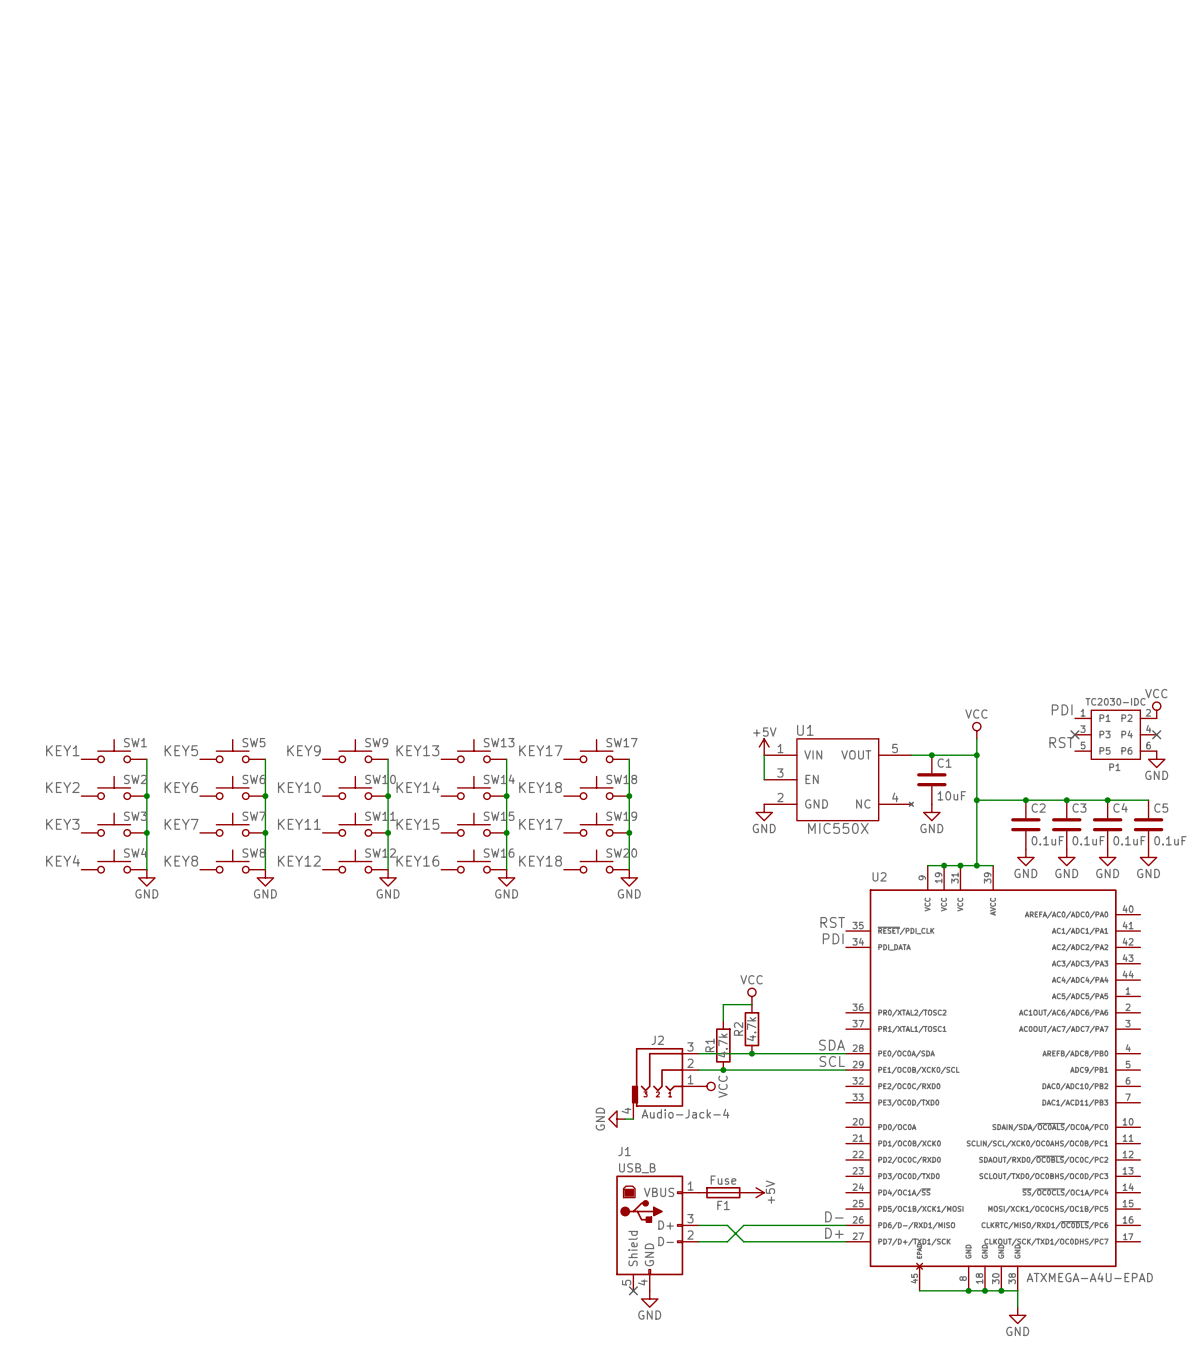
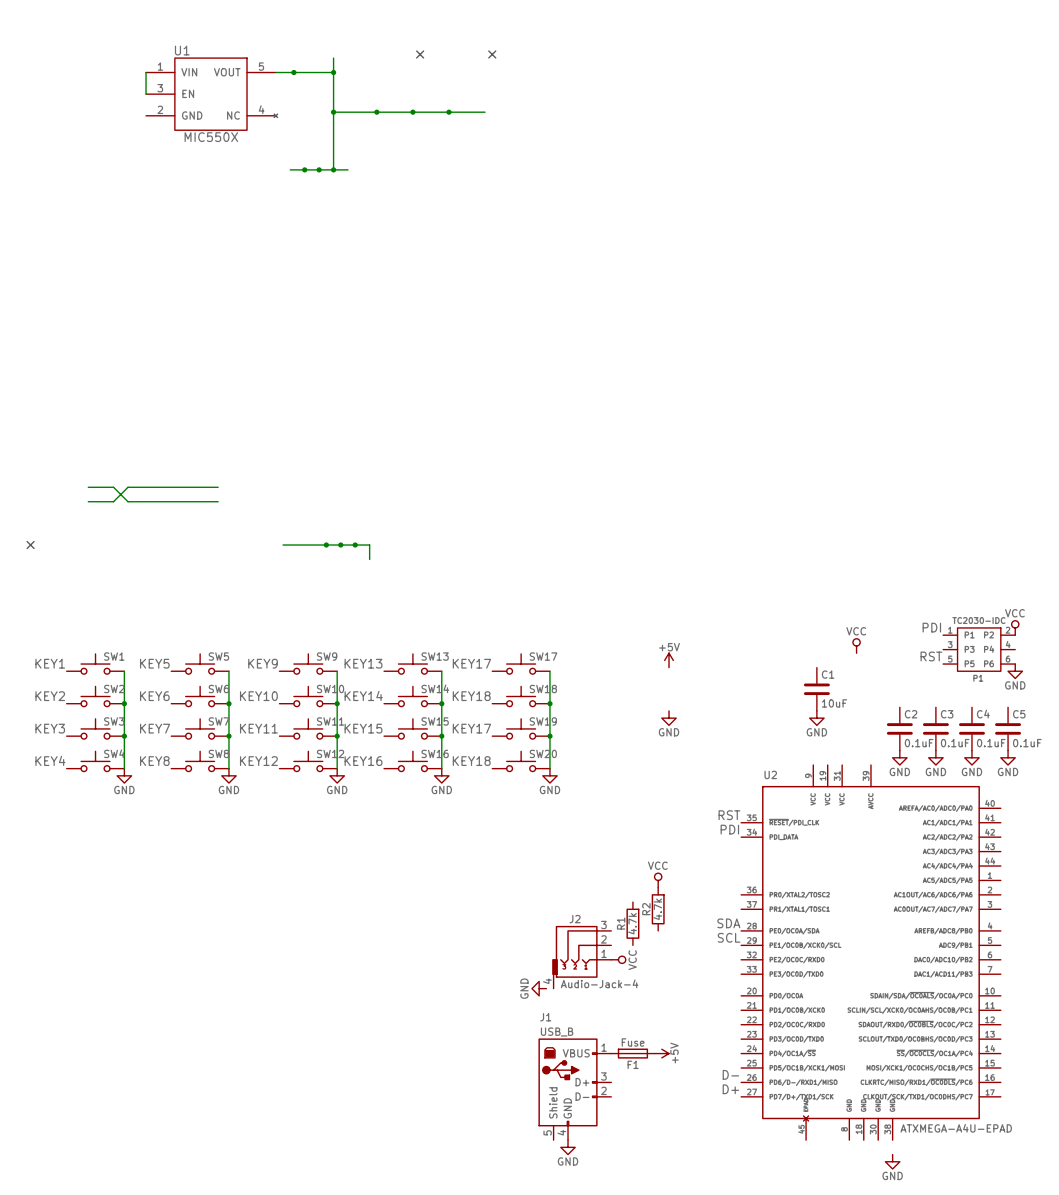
no-connect mark: none -> (420, 54)
no-connect mark: none -> (492, 54)
wire: none -> (333, 58) (333, 169)
wire: none -> (146, 72) (146, 94)
wire: none -> (275, 72) (333, 72)
junction: none -> (293, 72)
junction: none -> (333, 72)
wire: none -> (333, 112) (485, 112)
junction: none -> (333, 112)
junction: none -> (376, 112)
junction: none -> (412, 112)
junction: none -> (448, 112)
wire: none -> (290, 169) (347, 169)
junction: none -> (304, 169)
junction: none -> (319, 169)
junction: none -> (333, 169)
wire: none -> (88, 487) (113, 487) (127, 501) (218, 501)
wire: none -> (218, 487) (127, 487) (113, 501) (88, 501)
no-connect mark: none -> (30, 545)
wire: none -> (283, 545) (369, 545) (369, 559)
junction: none -> (326, 545)
junction: none -> (340, 545)
junction: none -> (355, 545)
no-connect mark: (1074, 734) -> none
no-connect mark: (1156, 734) -> none
wire: (976, 738) (976, 865) -> none
wire: (764, 755) (764, 779) -> none
wire: (911, 755) (976, 755) -> none
junction: (931, 755) -> none
junction: (976, 755) -> none
U1 position: (838, 779) -> (211, 94)
wire: (976, 800) (1148, 800) -> none
junction: (976, 800) -> none
junction: (1025, 800) -> none
junction: (1066, 800) -> none
junction: (1107, 800) -> none
wire: (927, 865) (993, 865) -> none
junction: (944, 865) -> none
junction: (960, 865) -> none
junction: (976, 865) -> none
wire: (751, 1004) (723, 1004) (723, 1020) -> none
wire: (698, 1053) (845, 1053) -> none
junction: (751, 1053) -> none
wire: (698, 1070) (845, 1070) -> none
junction: (723, 1070) -> none
wire: (625, 1119) (633, 1119) -> none
wire: (698, 1225) (727, 1225) (743, 1241) (845, 1241) -> none
wire: (845, 1225) (743, 1225) (727, 1241) (698, 1241) -> none
no-connect mark: (633, 1290) -> none
wire: (919, 1290) (1017, 1290) (1017, 1307) -> none
junction: (968, 1290) -> none
junction: (984, 1290) -> none
junction: (1001, 1290) -> none

